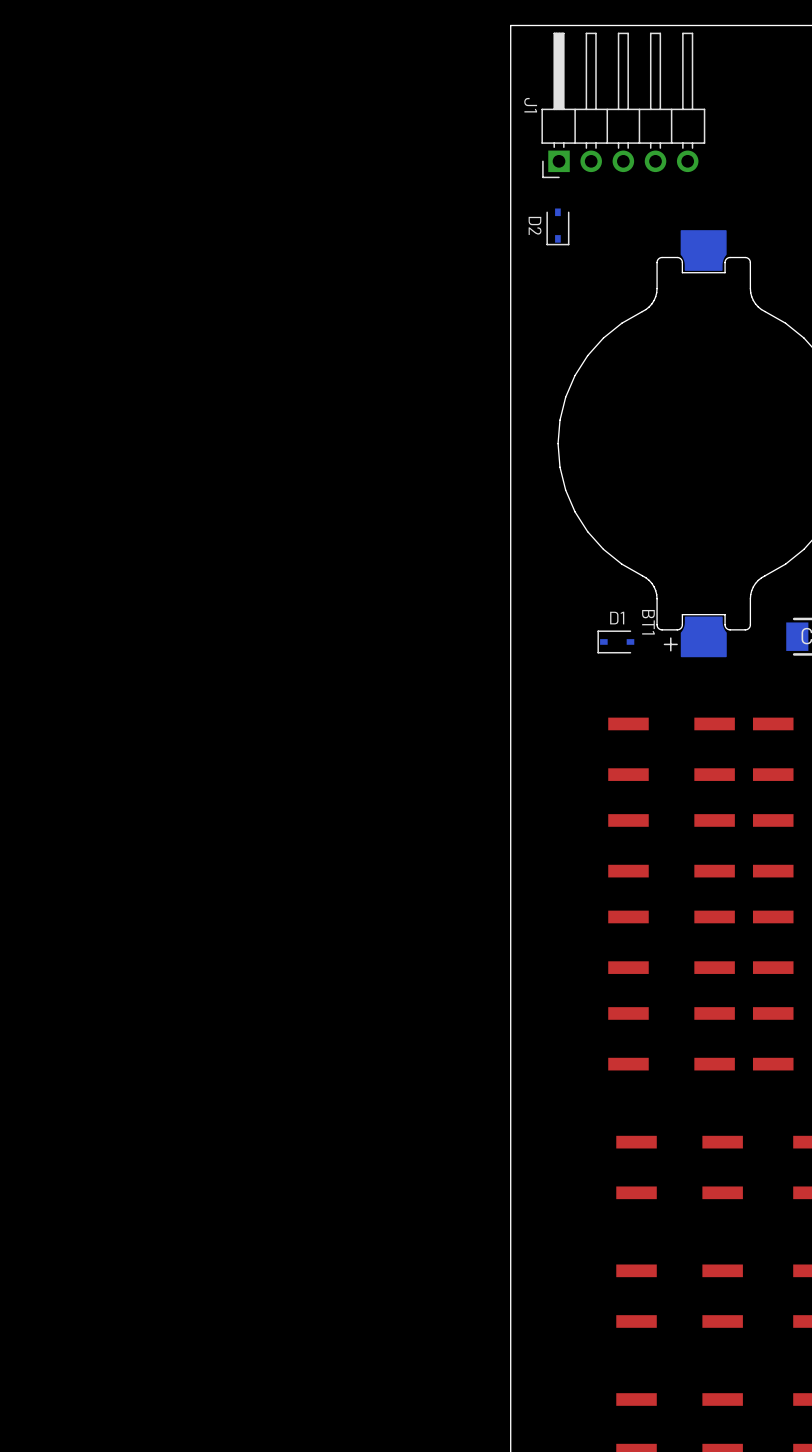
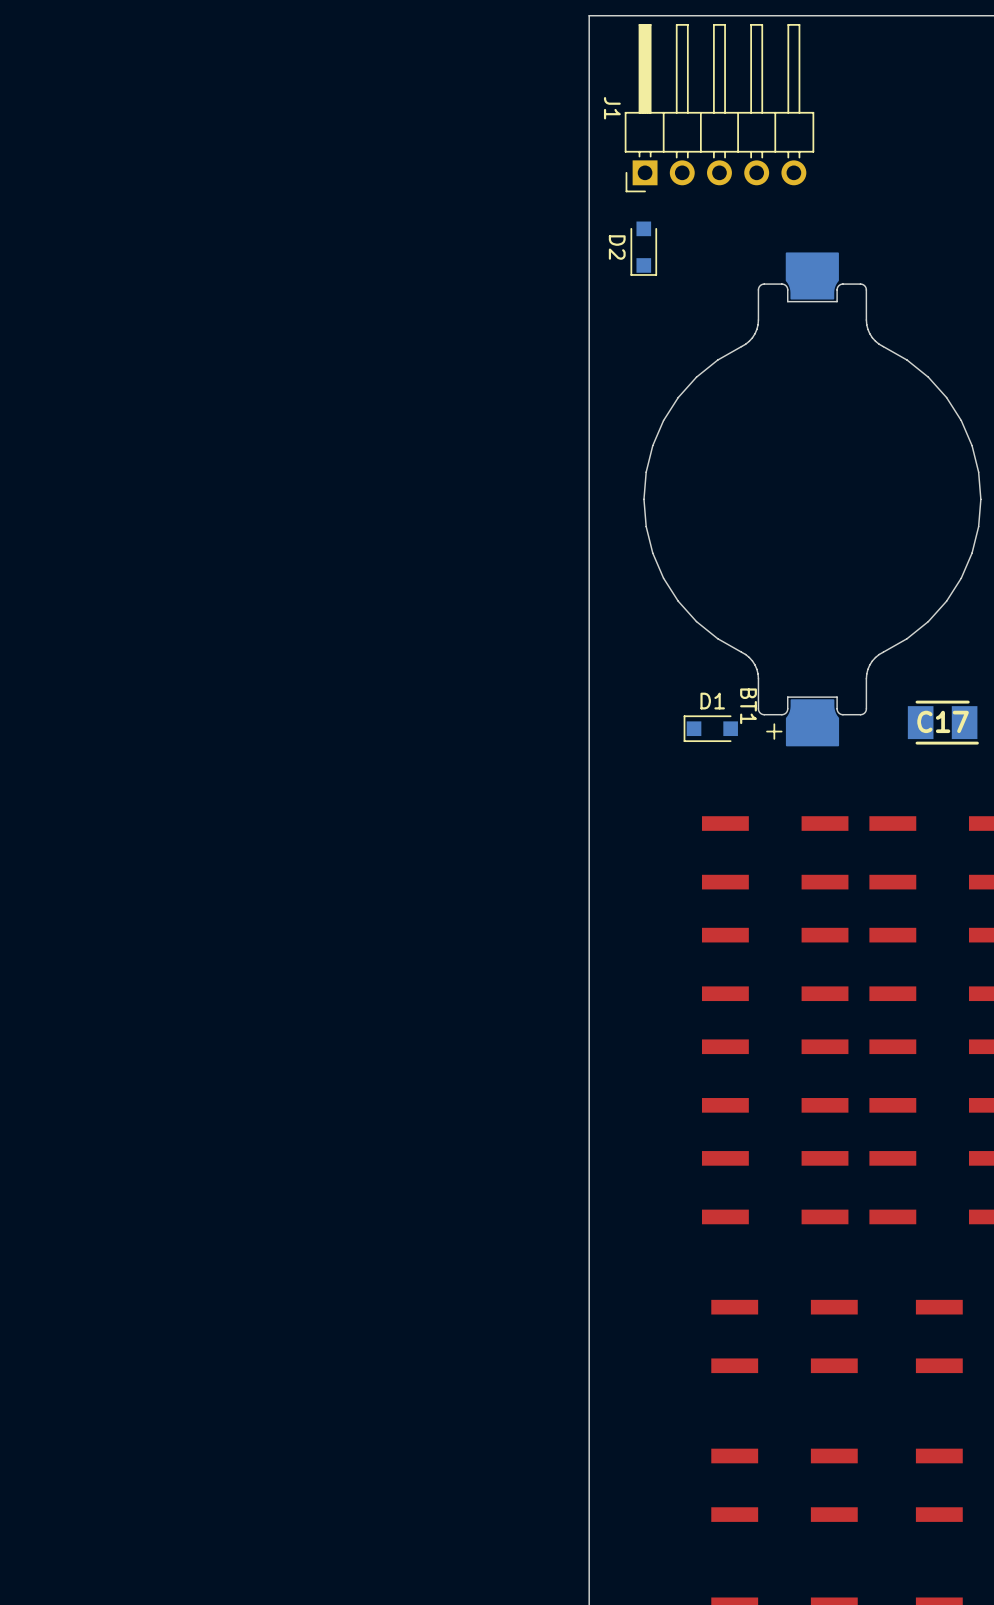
D2 footprint: [546, 208, 570, 246] -> [630, 221, 658, 276]
D1 footprint: [597, 630, 635, 654] -> [683, 715, 738, 743]

